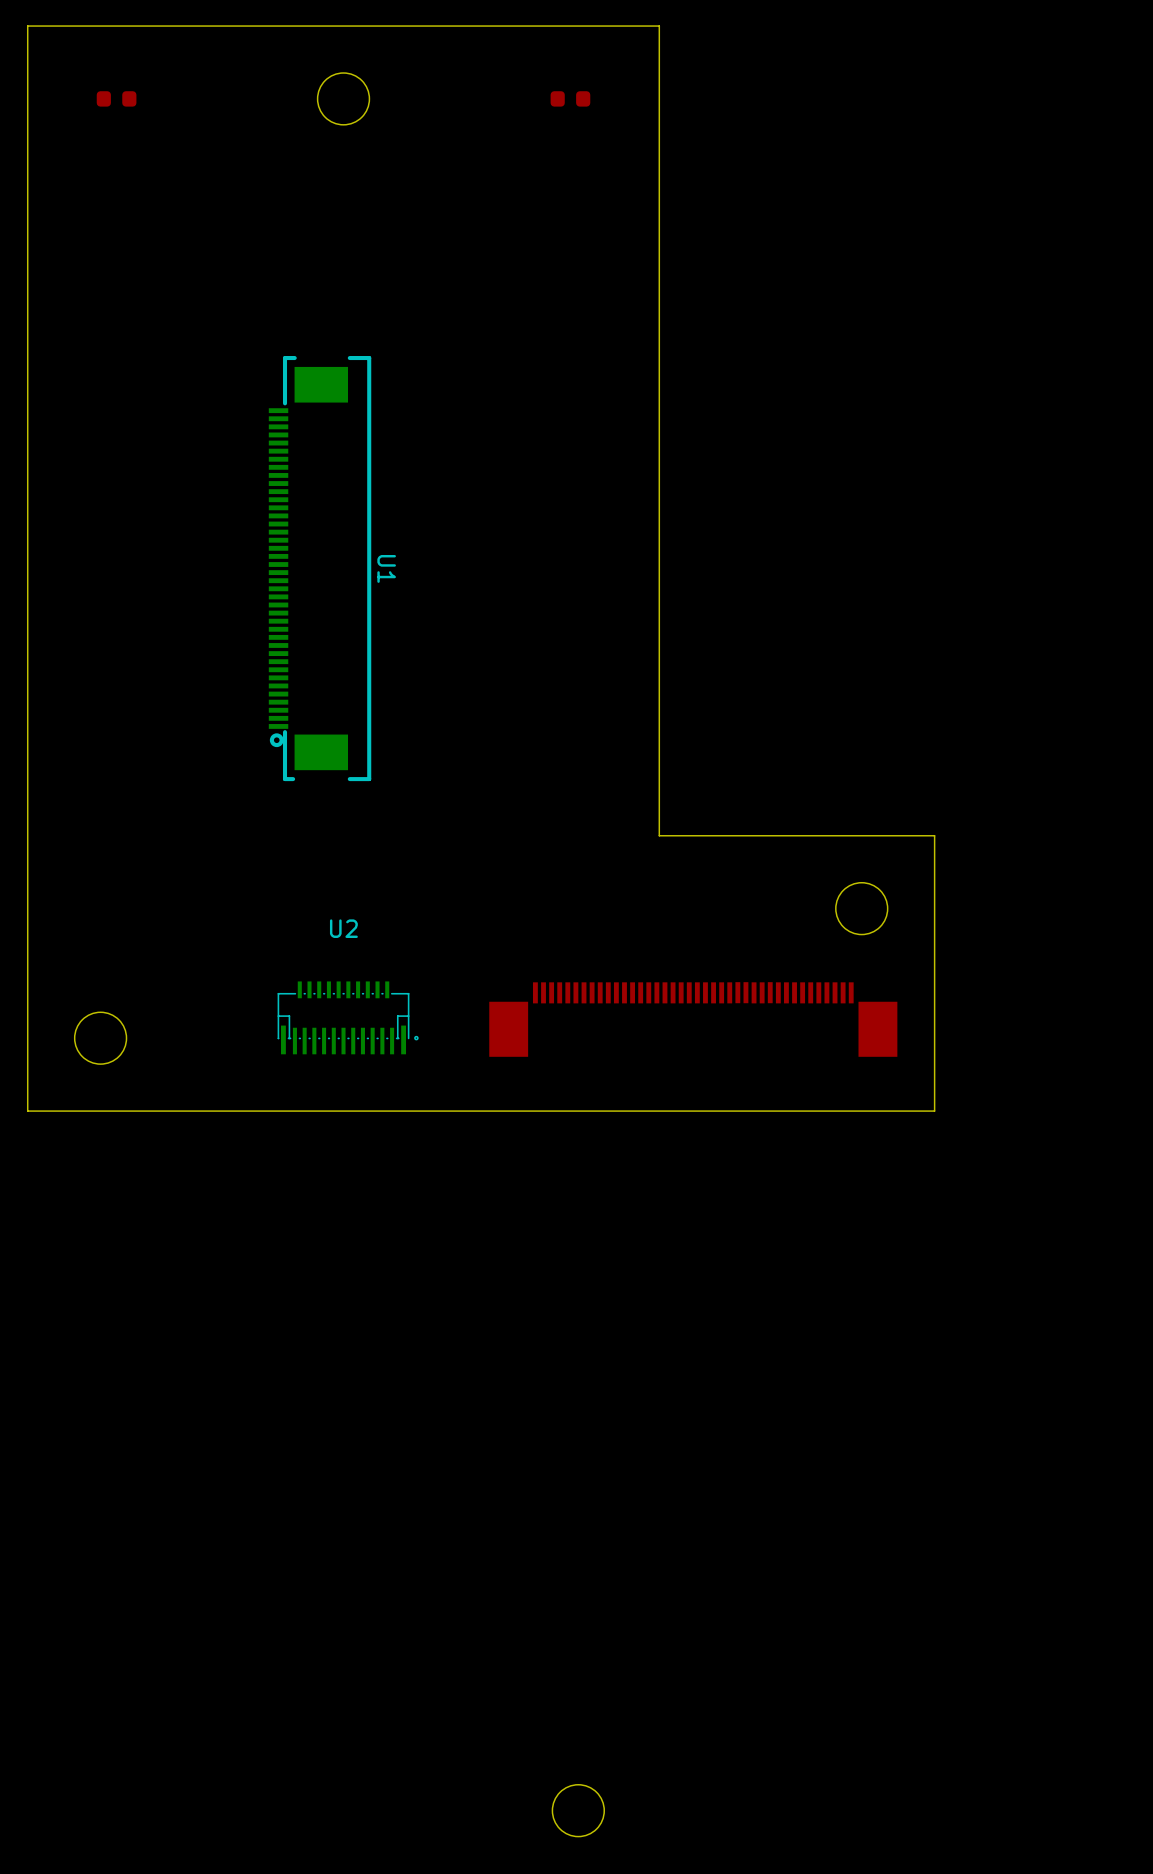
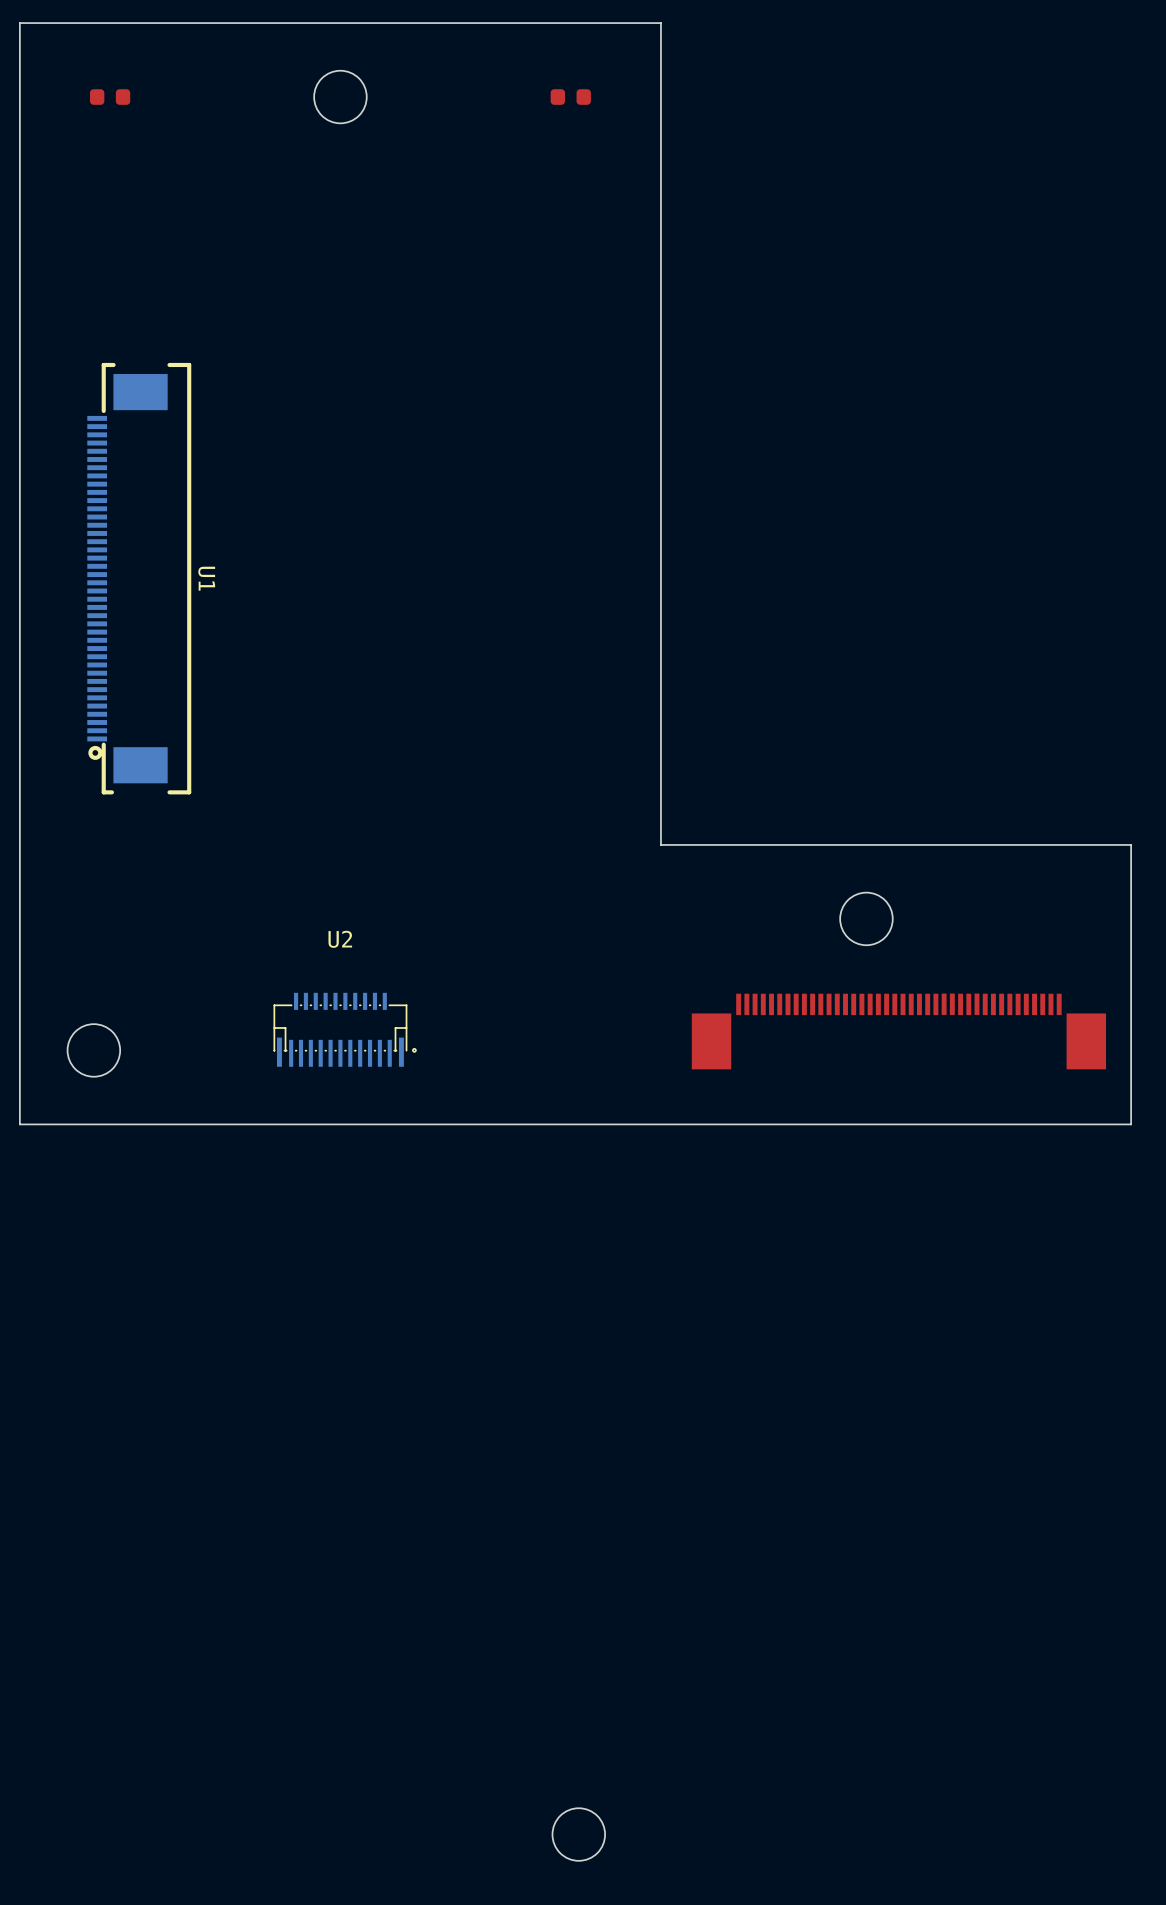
U1 position: (320, 568) -> (139, 578)
board edge: (934, 835) (934, 1111) -> (940, 844) (1131, 844) (1131, 1124) (940, 1124)
part position: (693, 1019) -> (898, 1031)

